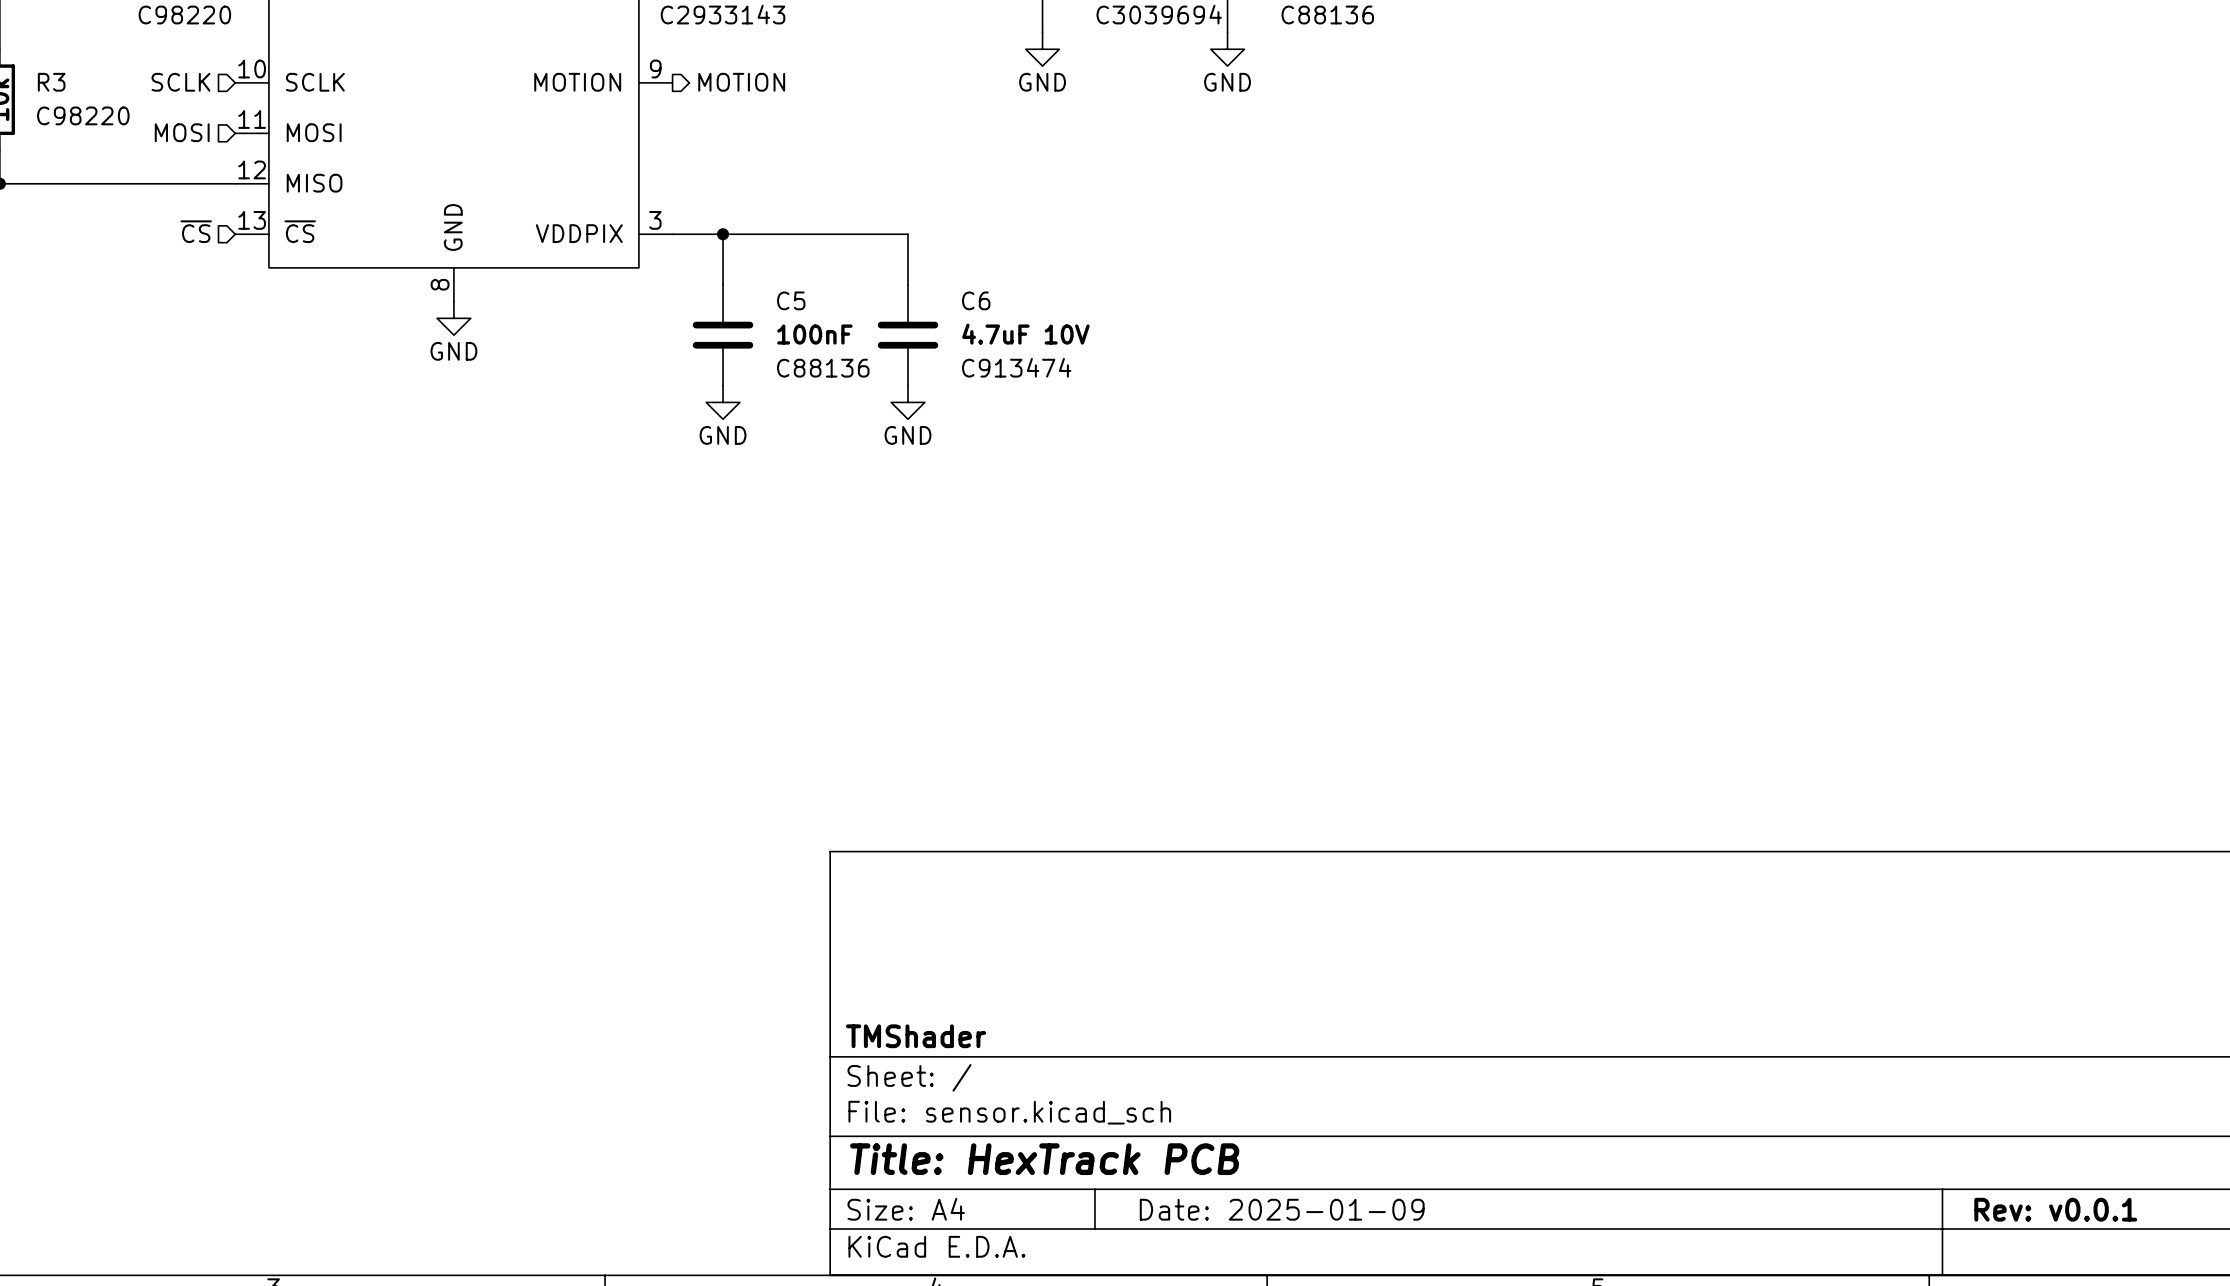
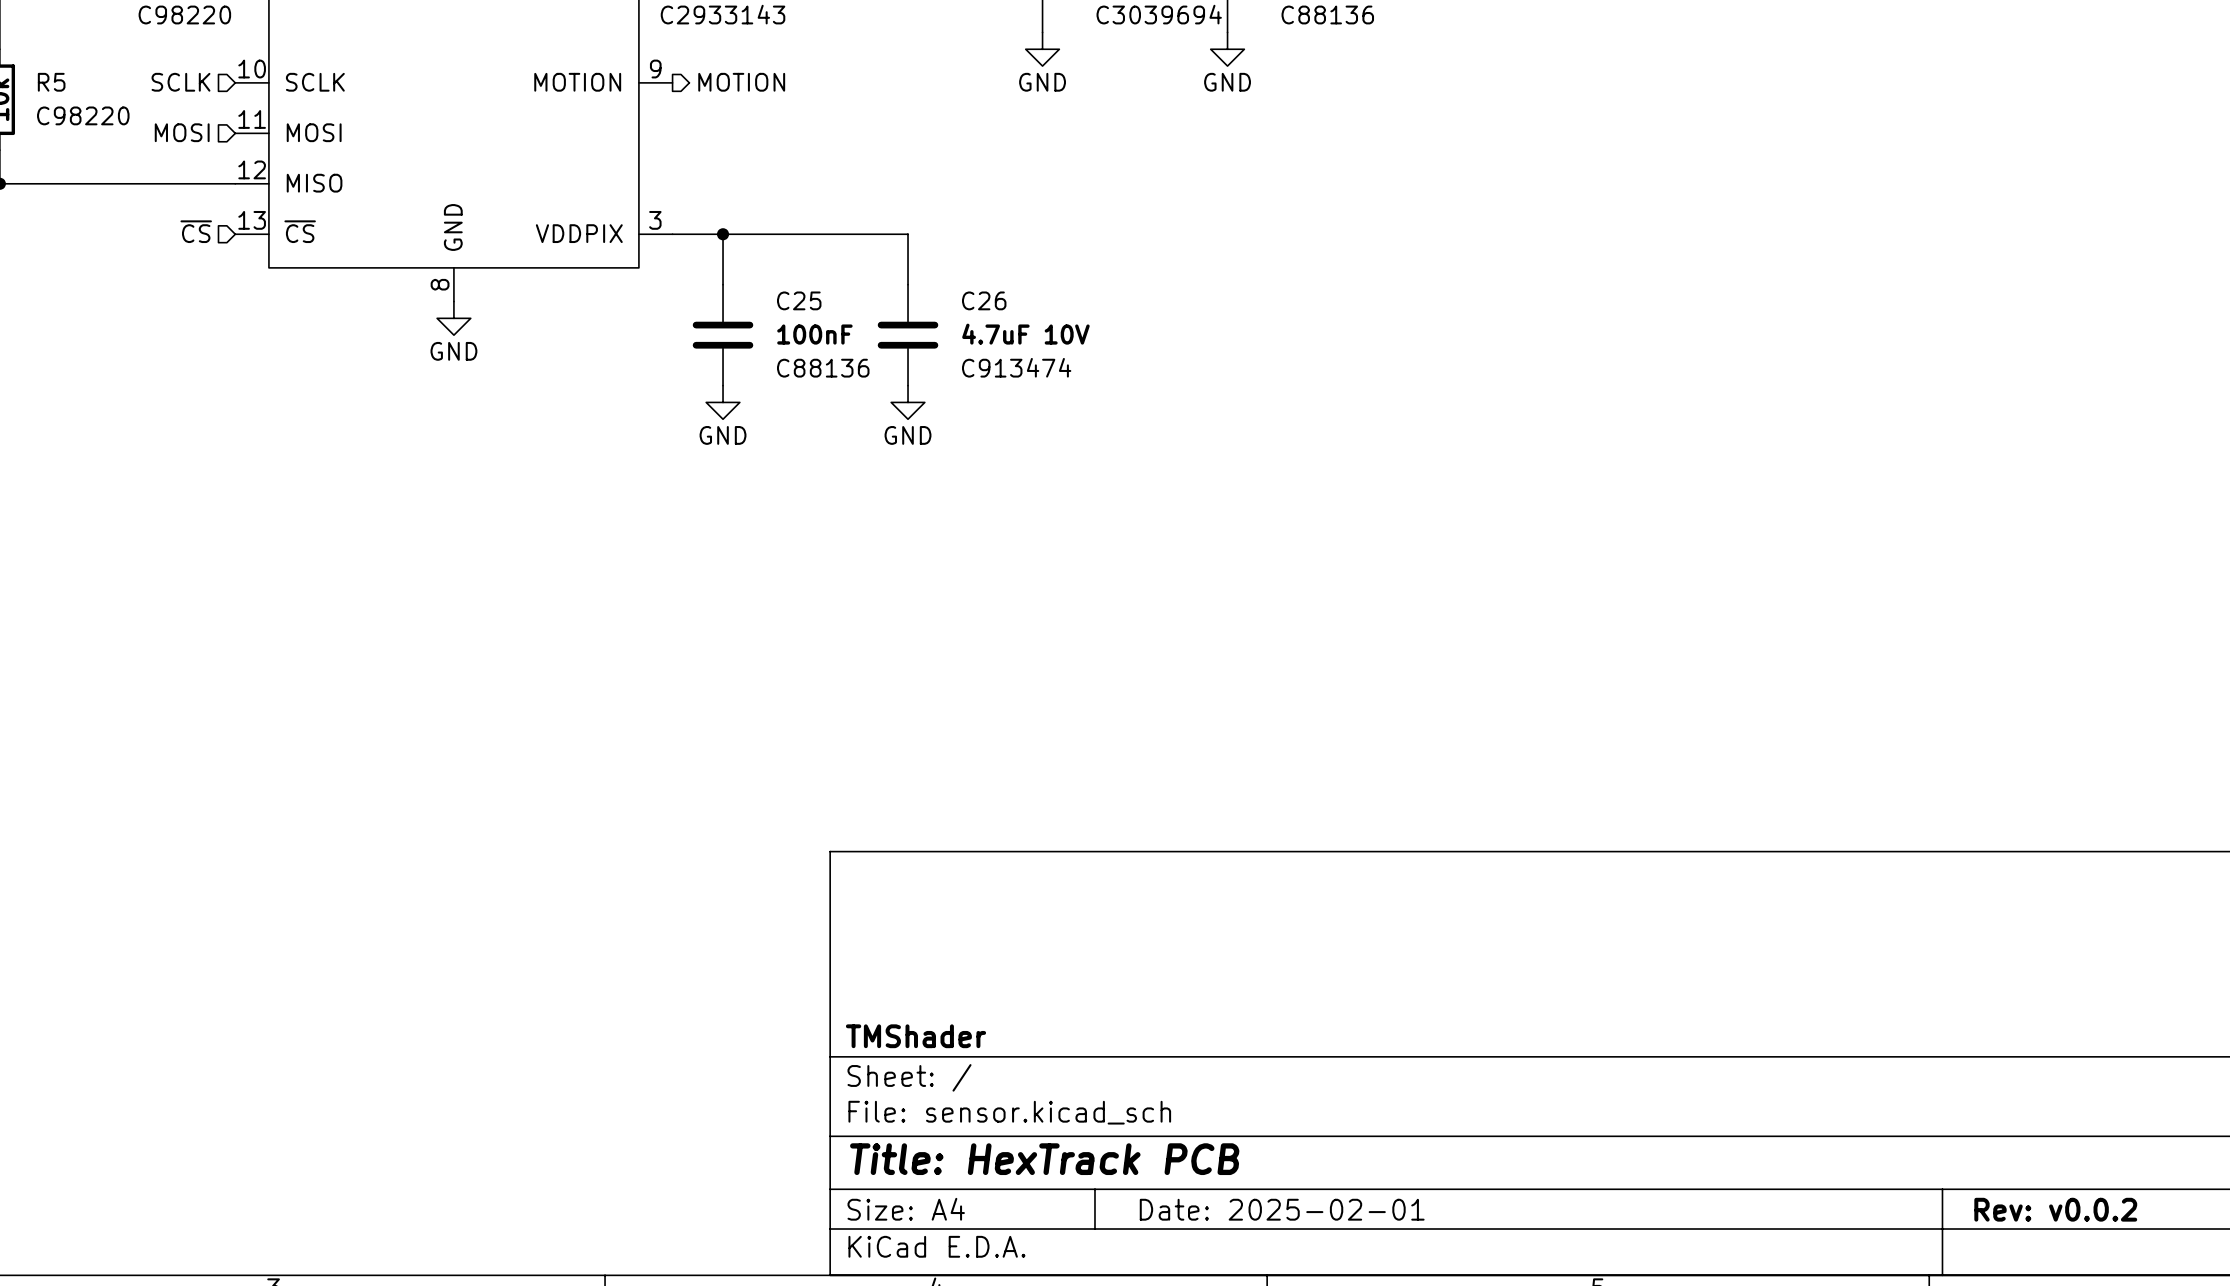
R3 name: R3 (51, 82) -> R5 (51, 82)
C5 name: C5 (791, 300) -> C25 (799, 300)
C6 name: C6 (976, 300) -> C26 (984, 300)
title block: Date: 2025-01-09 (1282, 1209) -> Date: 2025-02-01 (1282, 1209)
title block: Rev: v0.0.1 (2055, 1209) -> Rev: v0.0.2 (2055, 1209)

